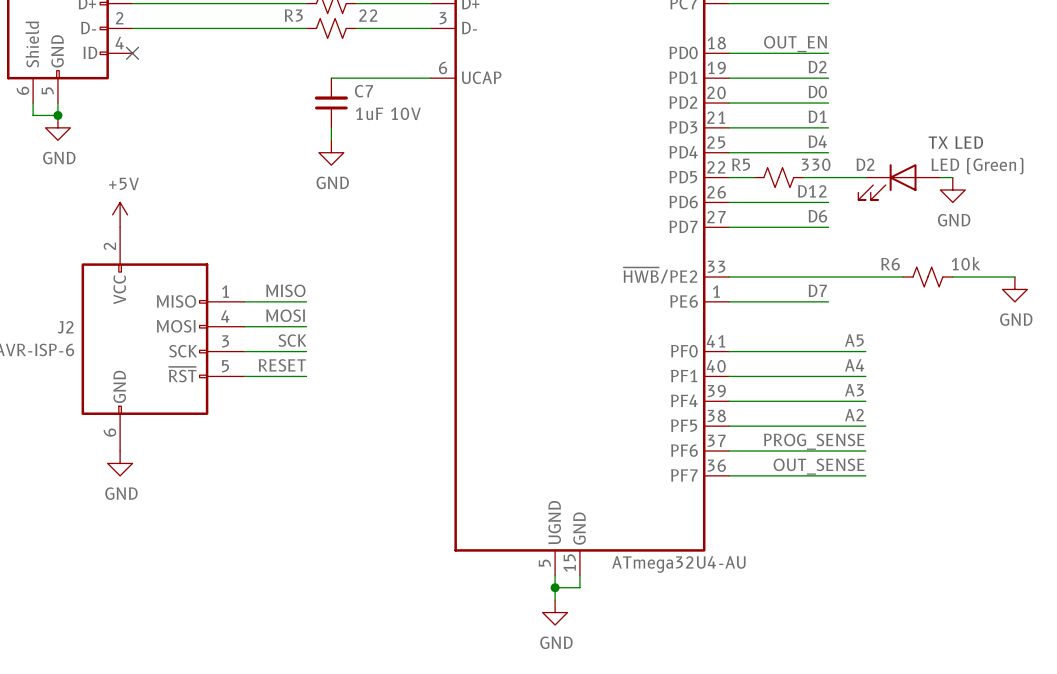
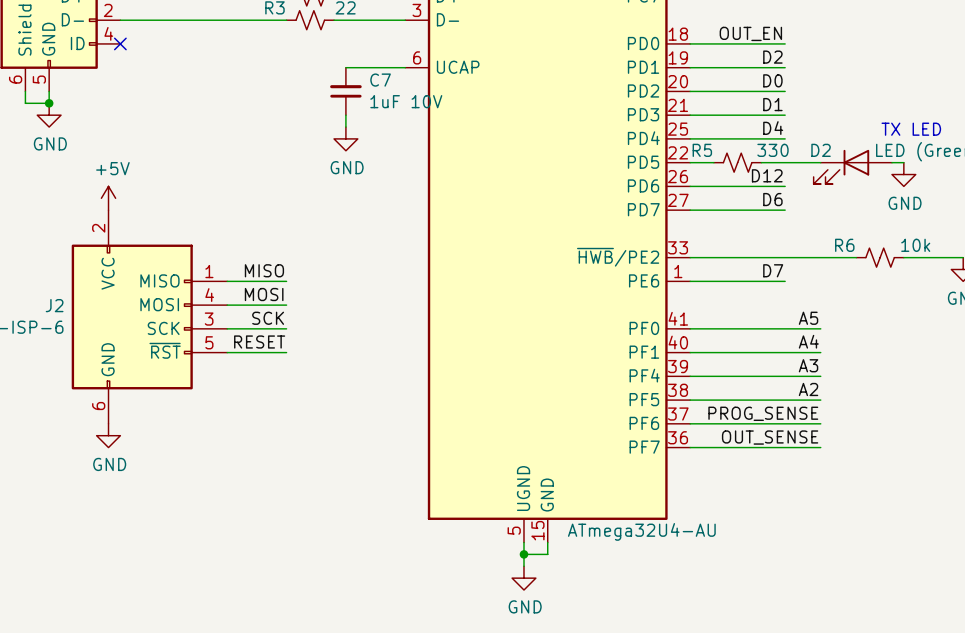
wire: (331, 78) (368, 78) -> none
C7 position: (331, 103) -> (345, 91)
wire: (331, 127) (331, 140) -> (345, 115) (345, 127)
power symbol position: GND (331, 152) -> GND (345, 138)

